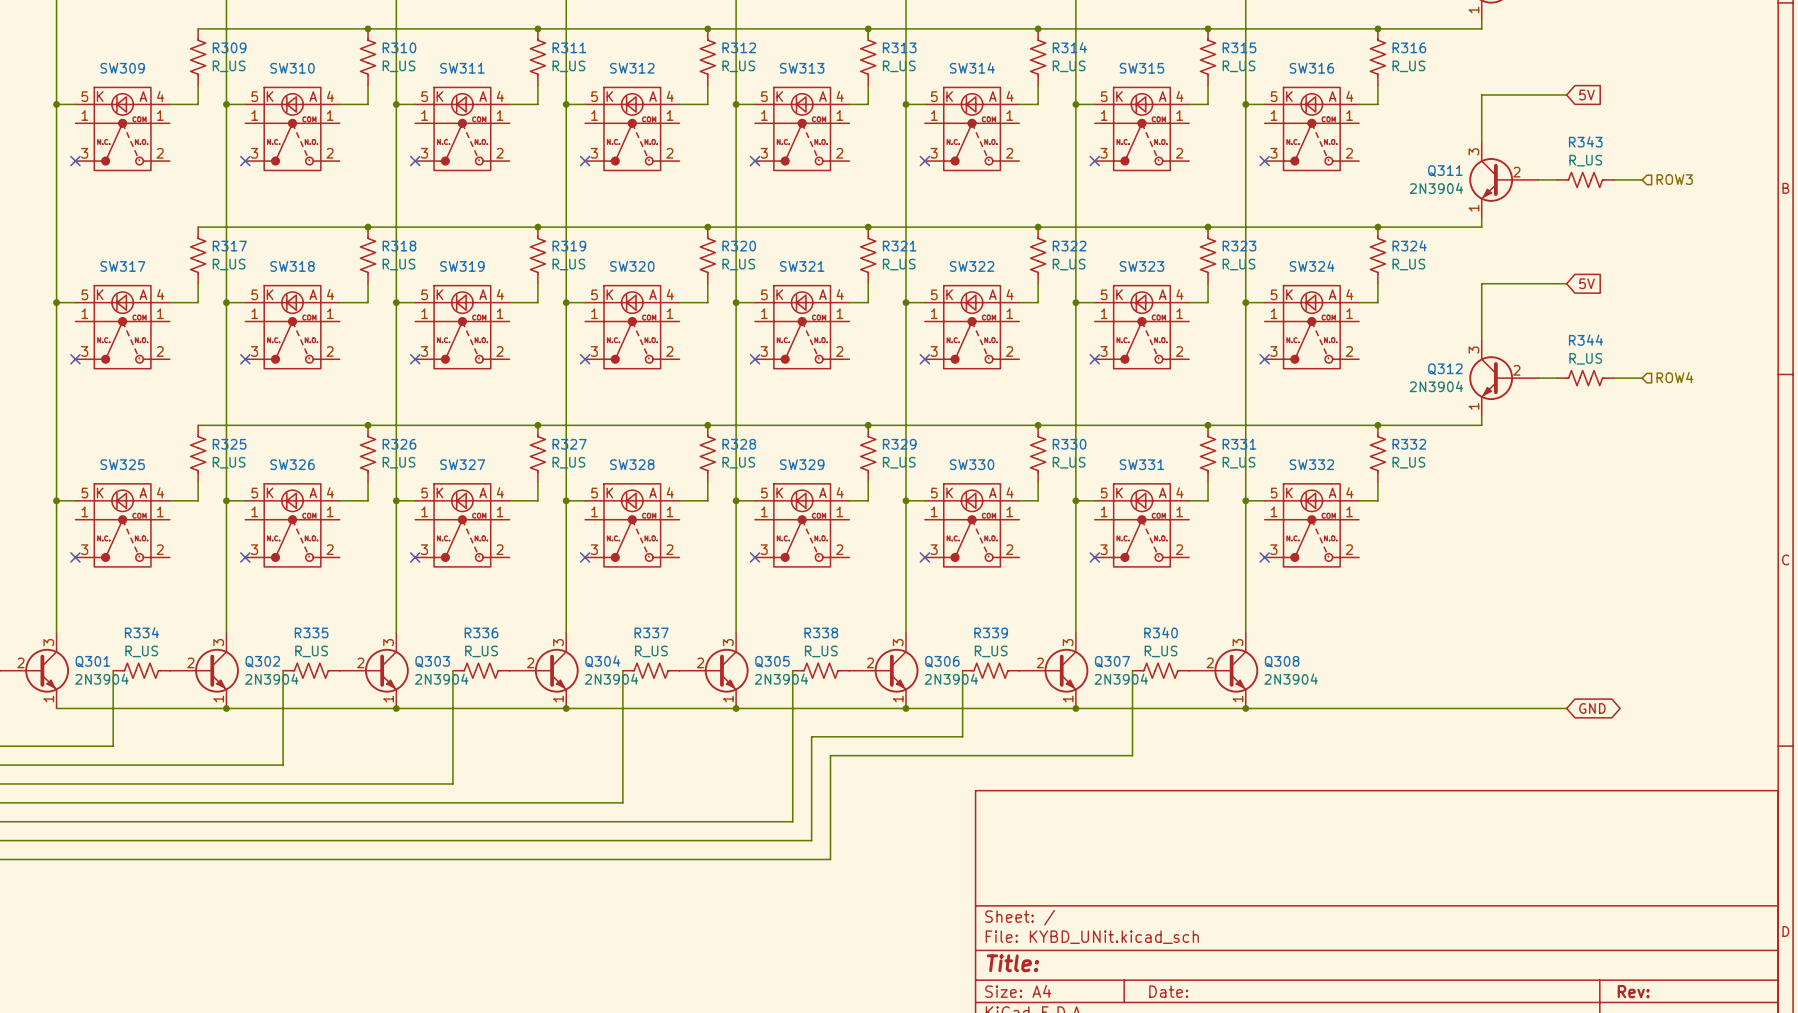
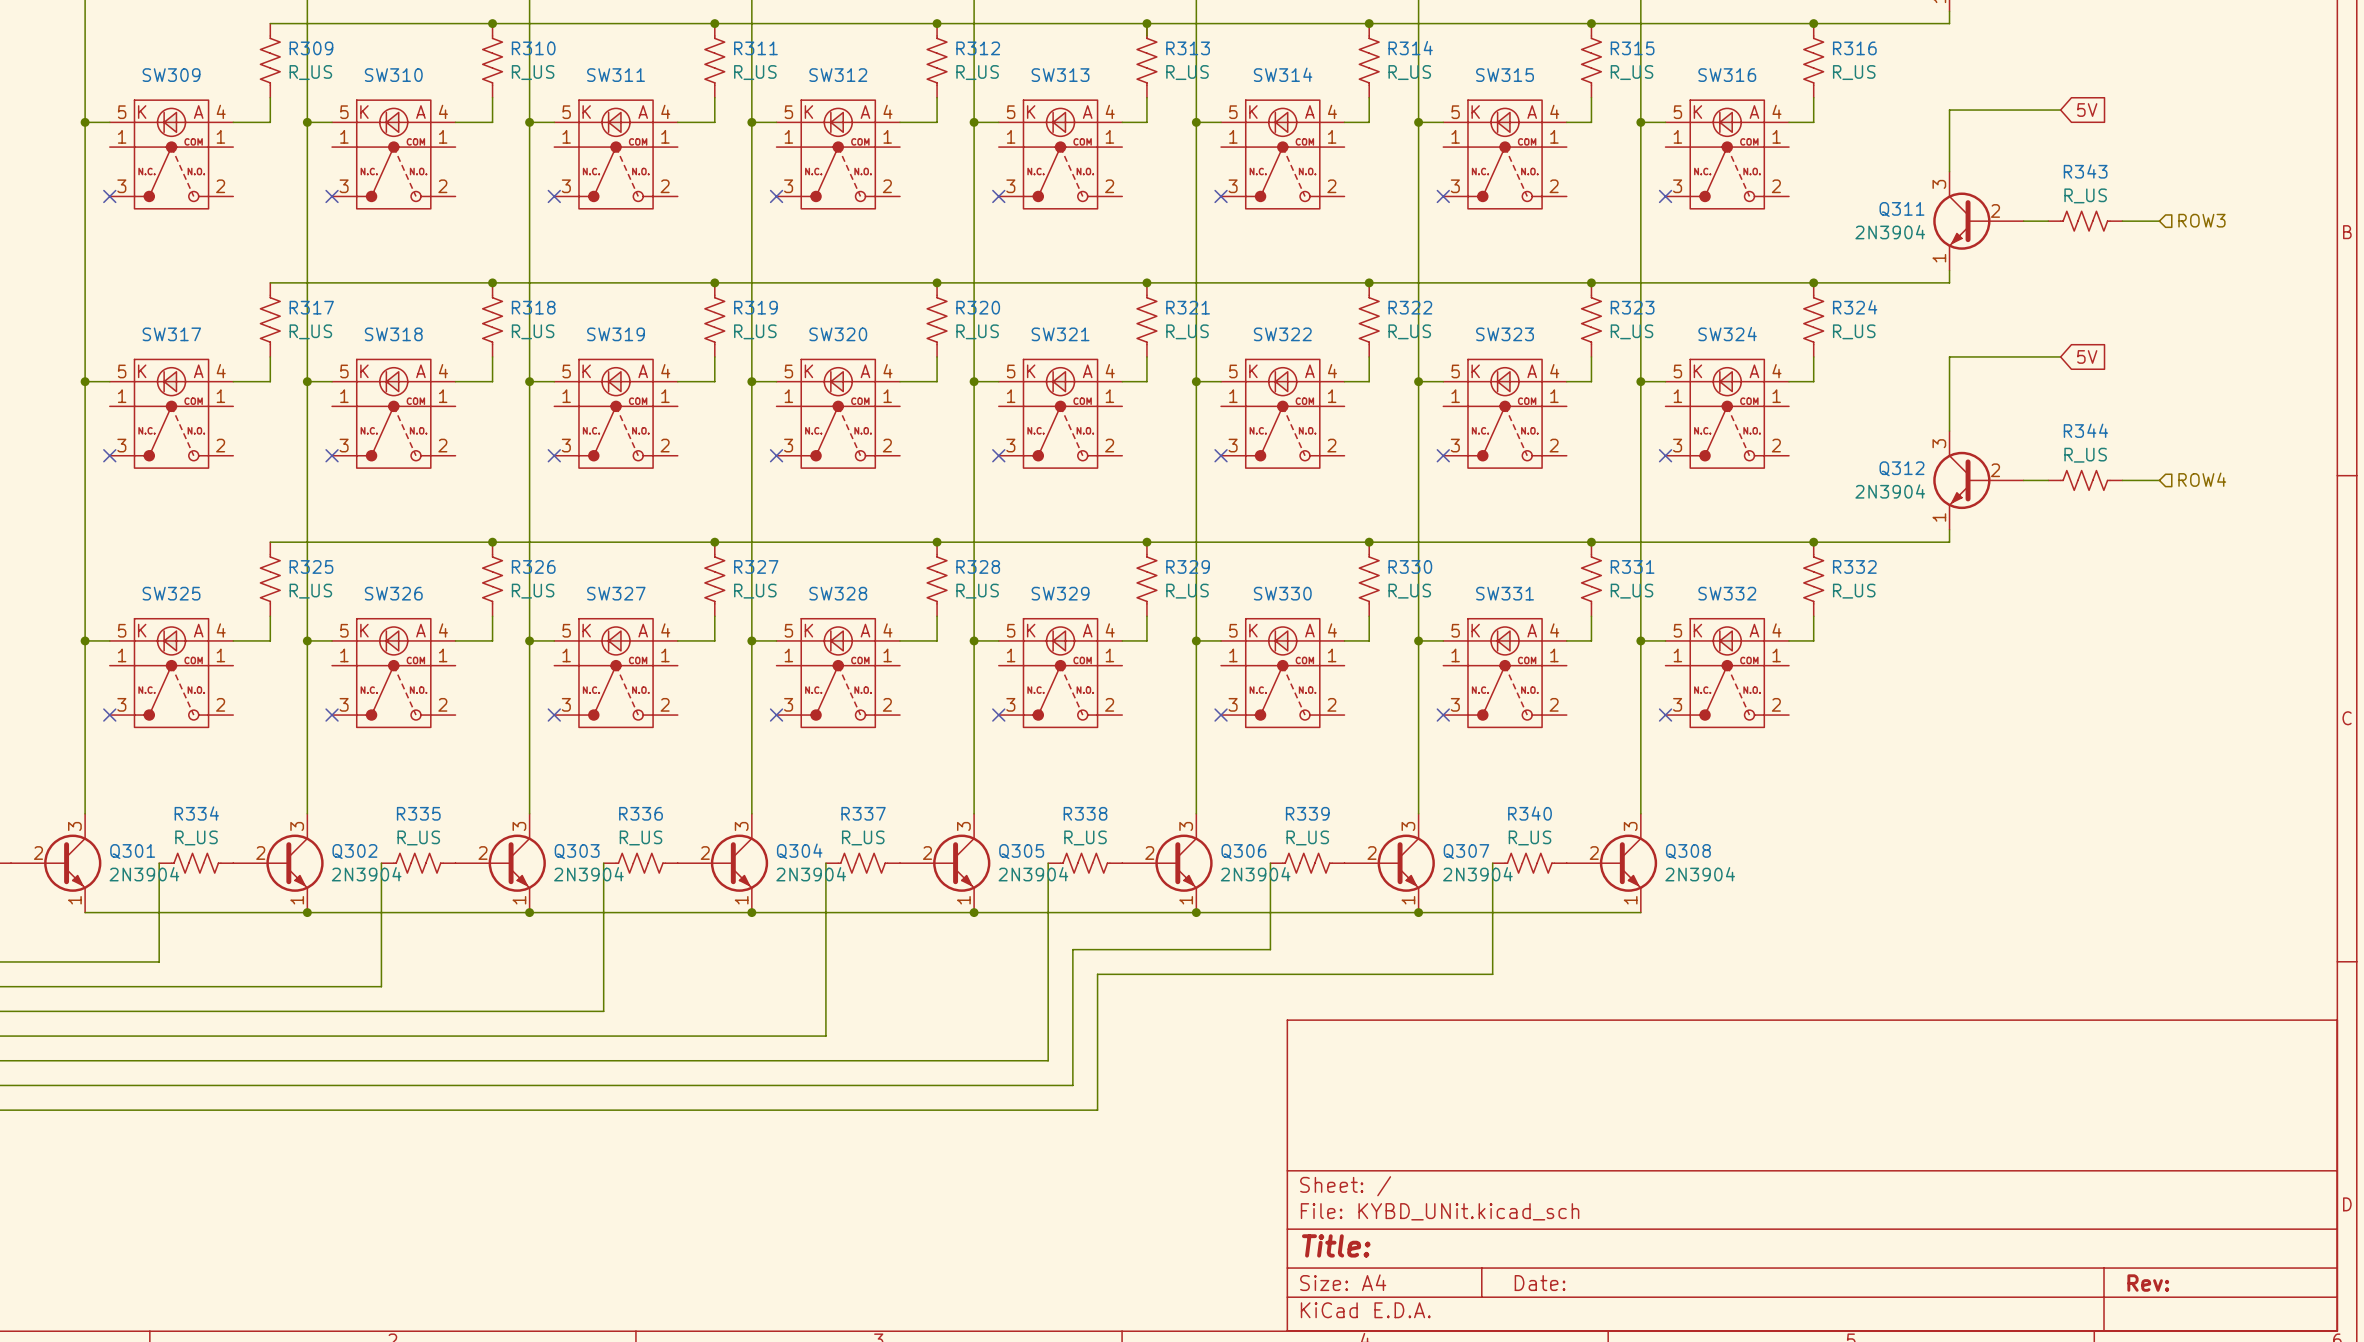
wire: (1245, 708) (1566, 708) -> none
junction: (1245, 708) -> none
global label: GND (1592, 708) -> none

